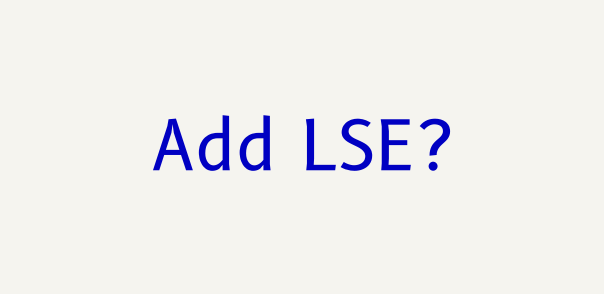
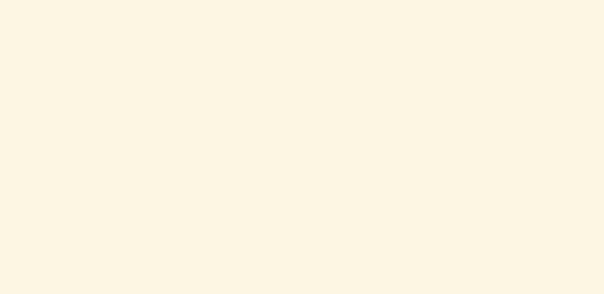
text: Add LSE? (301, 143) -> none

